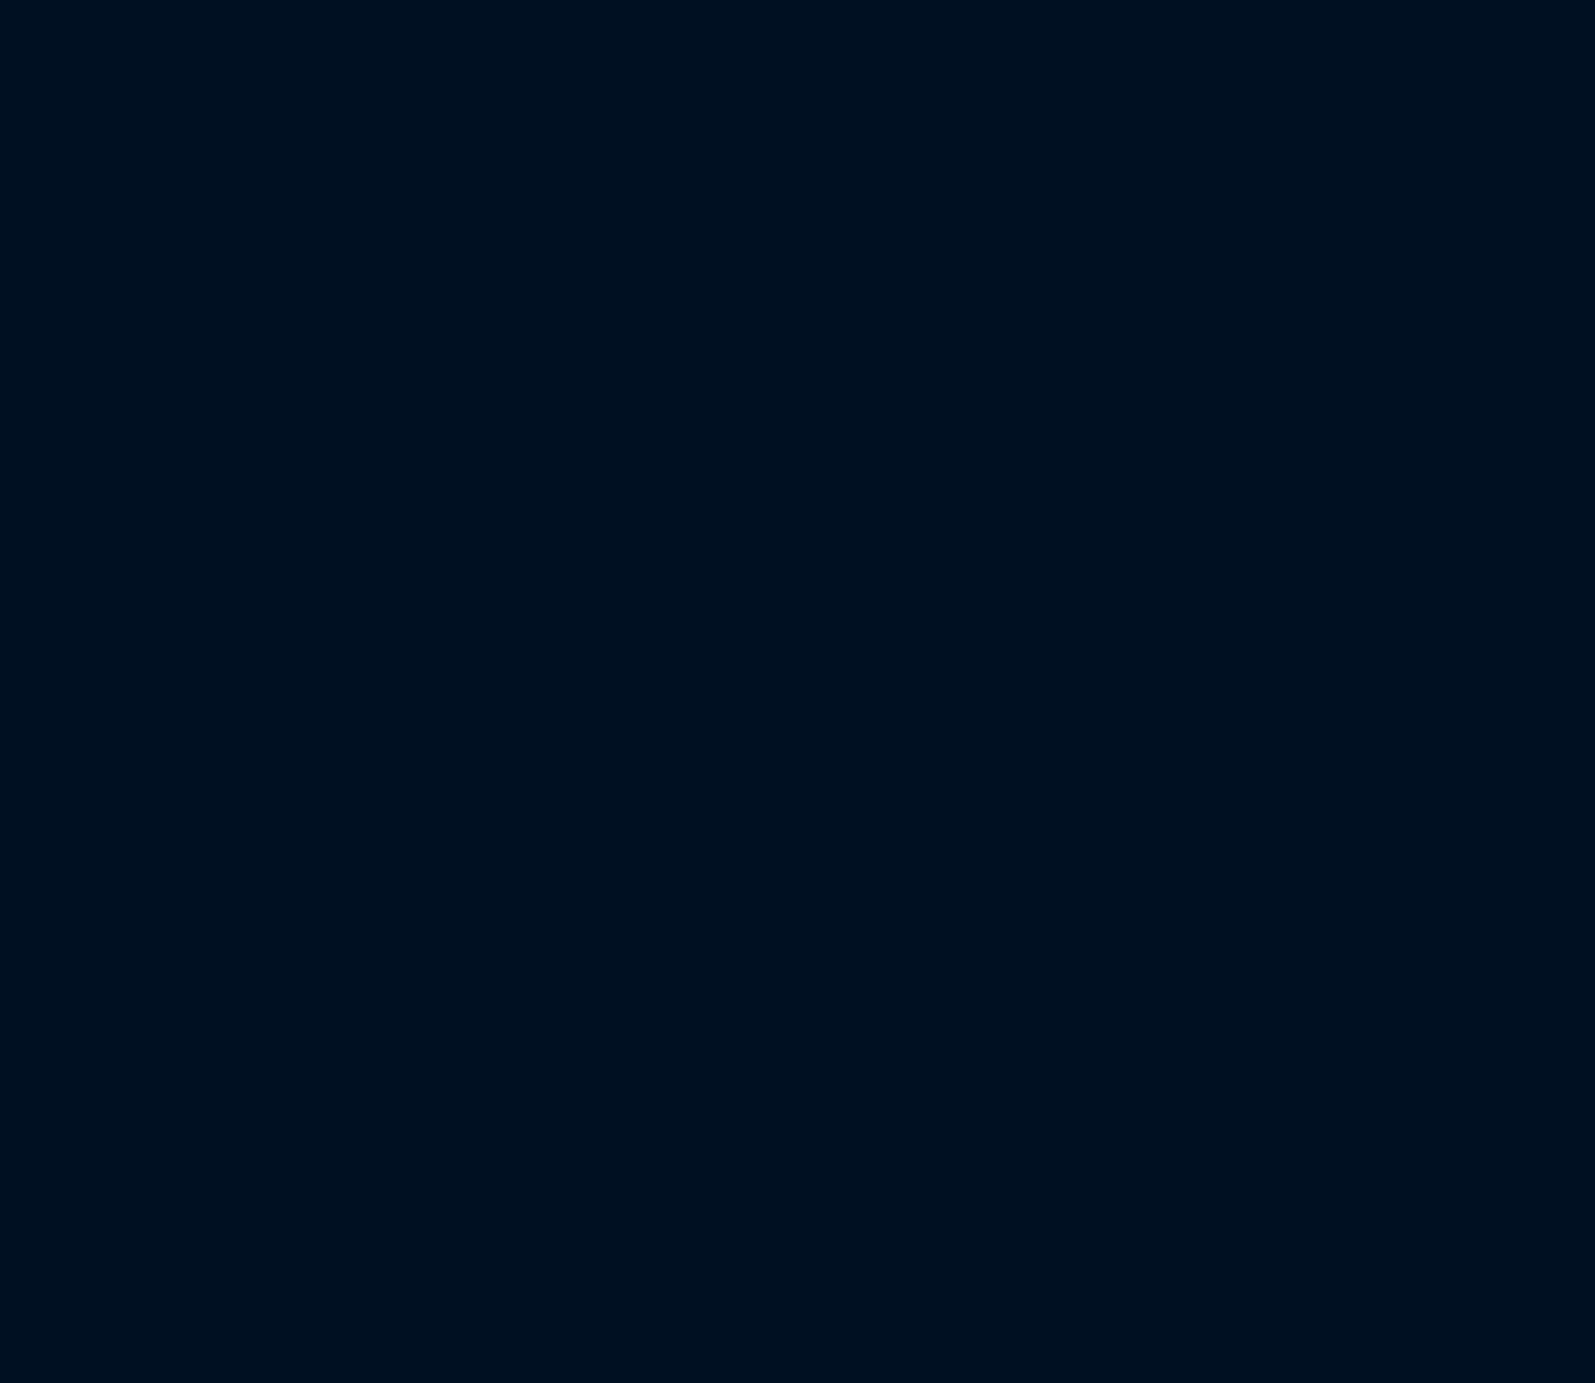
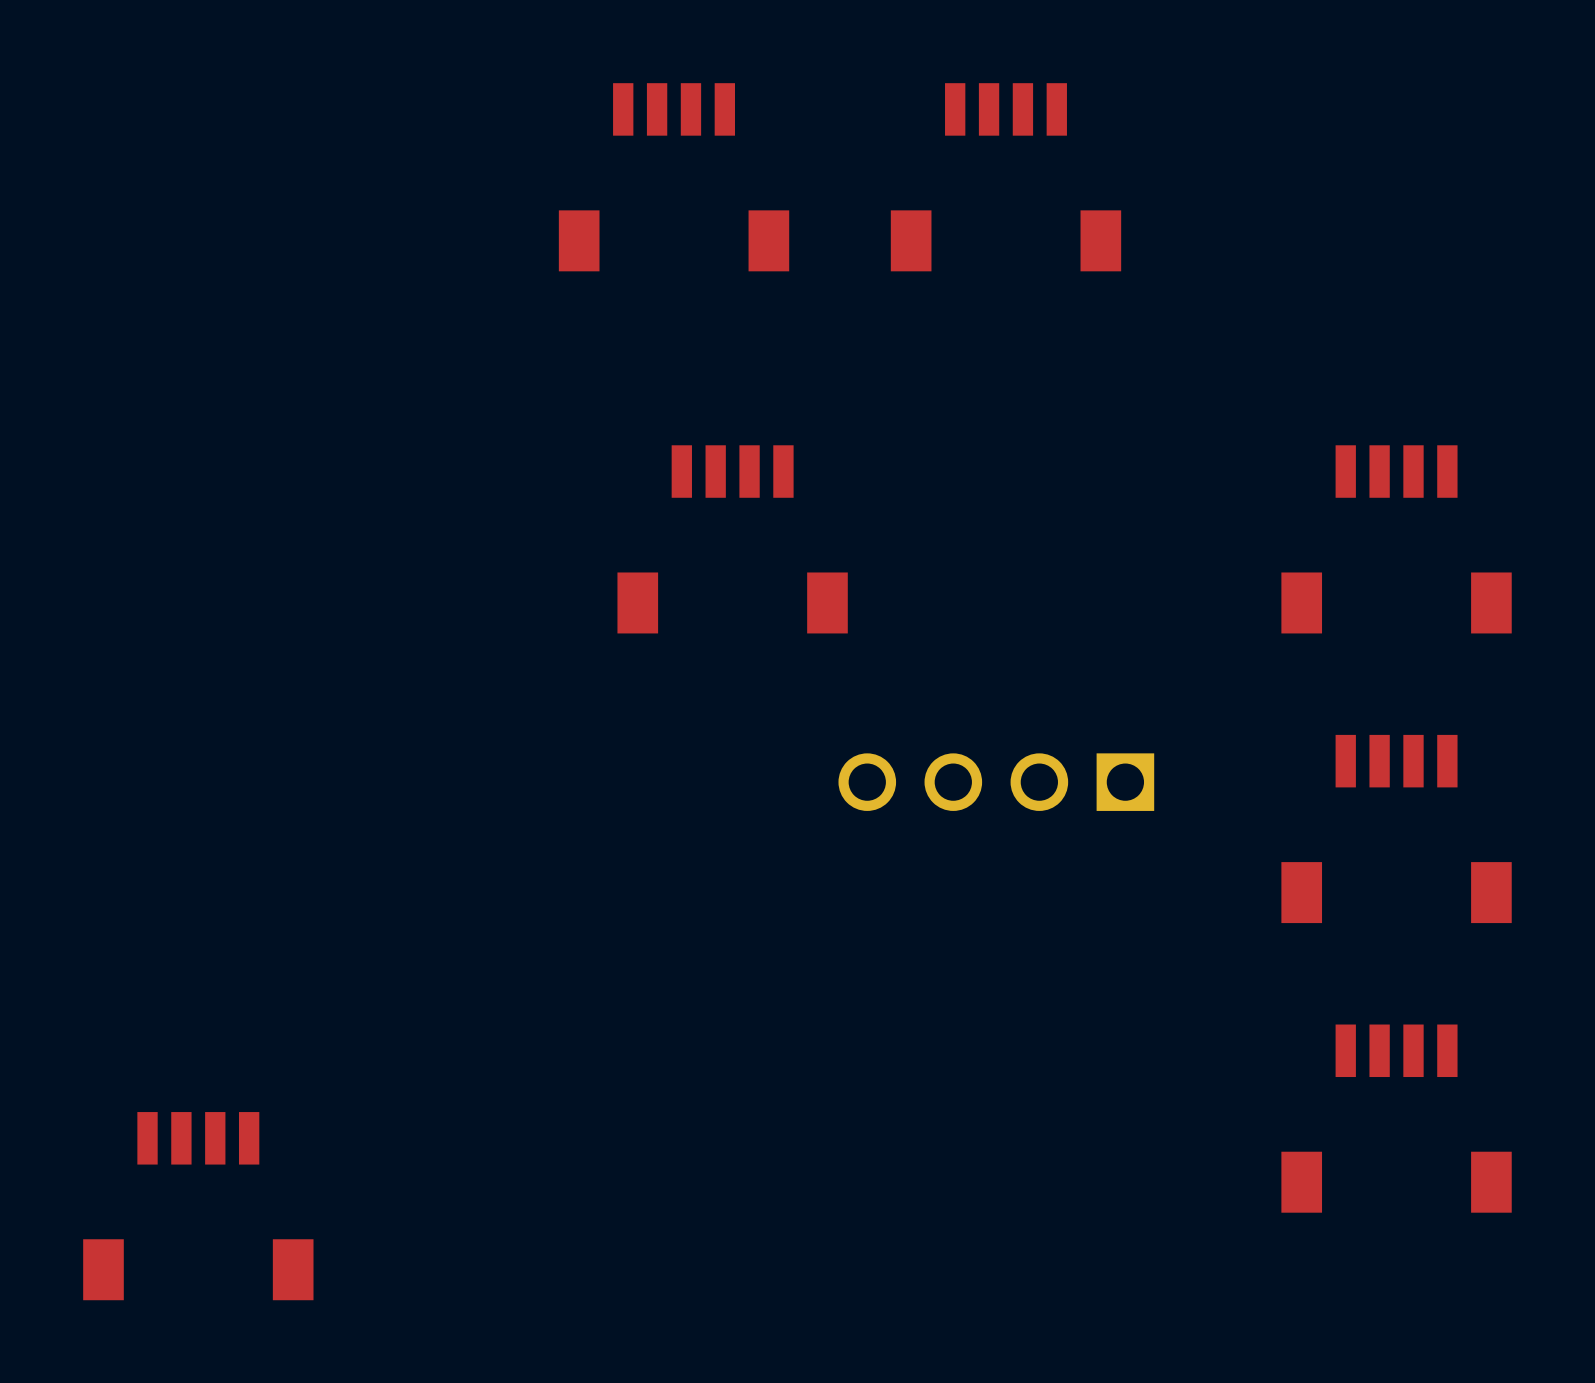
part: none -> (674, 177)
part: none -> (1005, 177)
part: none -> (732, 539)
part: none -> (1396, 539)
part: none -> (996, 782)
part: none -> (1396, 828)
part: none -> (1396, 1118)
part: none -> (198, 1206)

